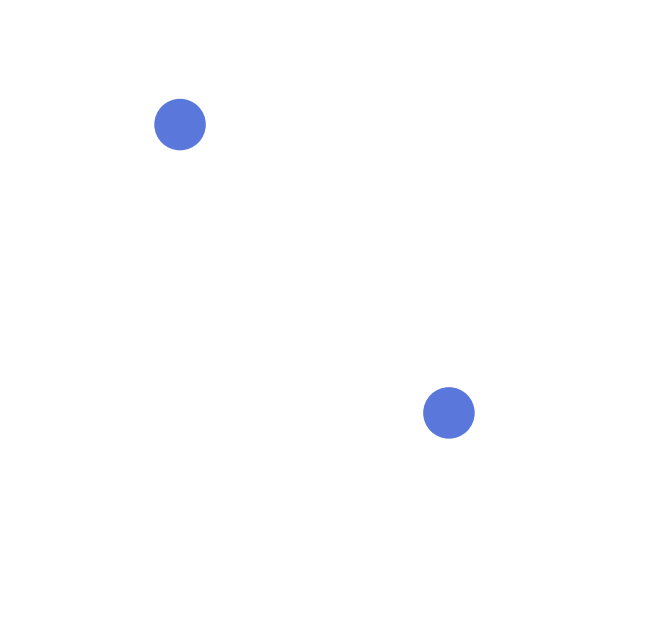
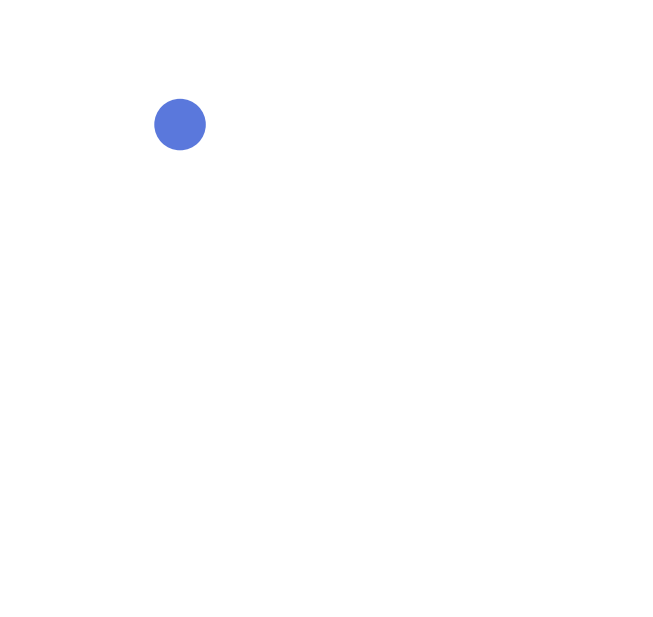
part: (448, 412) -> none

